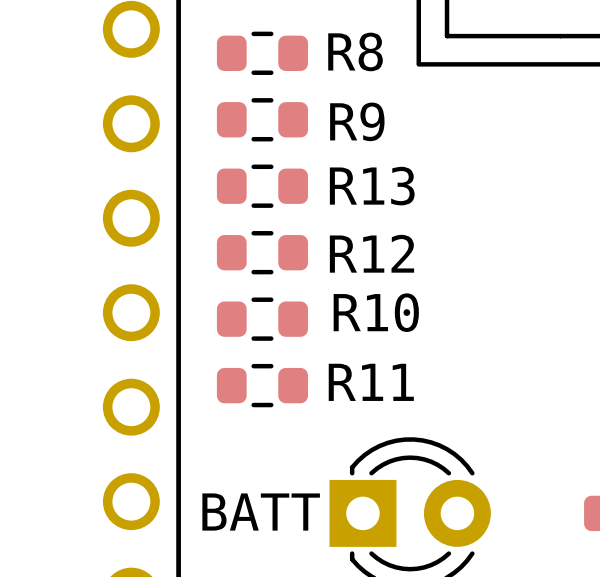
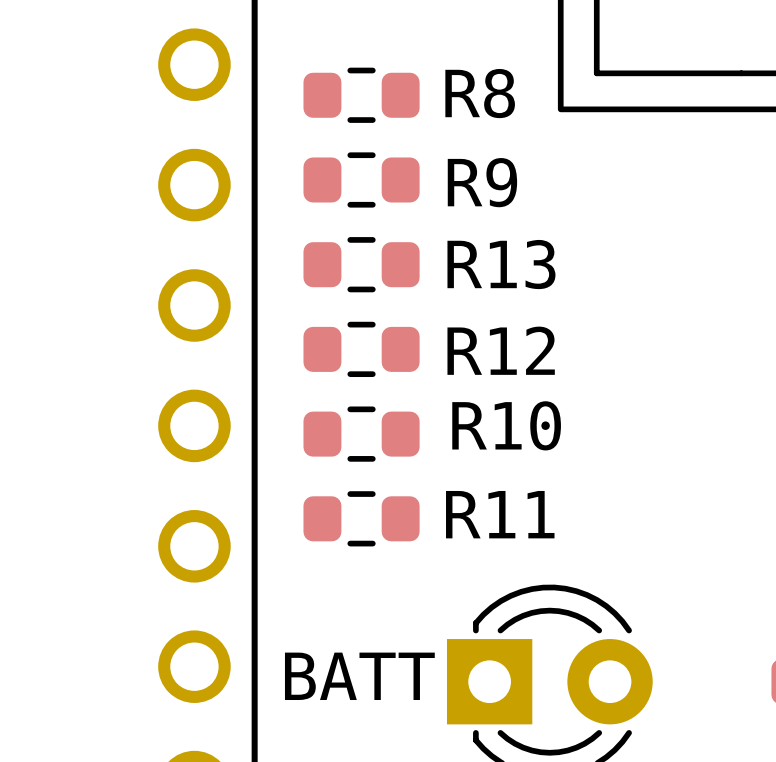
BATT name: none -> BATT (359, 676)
BATT text: BATT (261, 512) -> none

